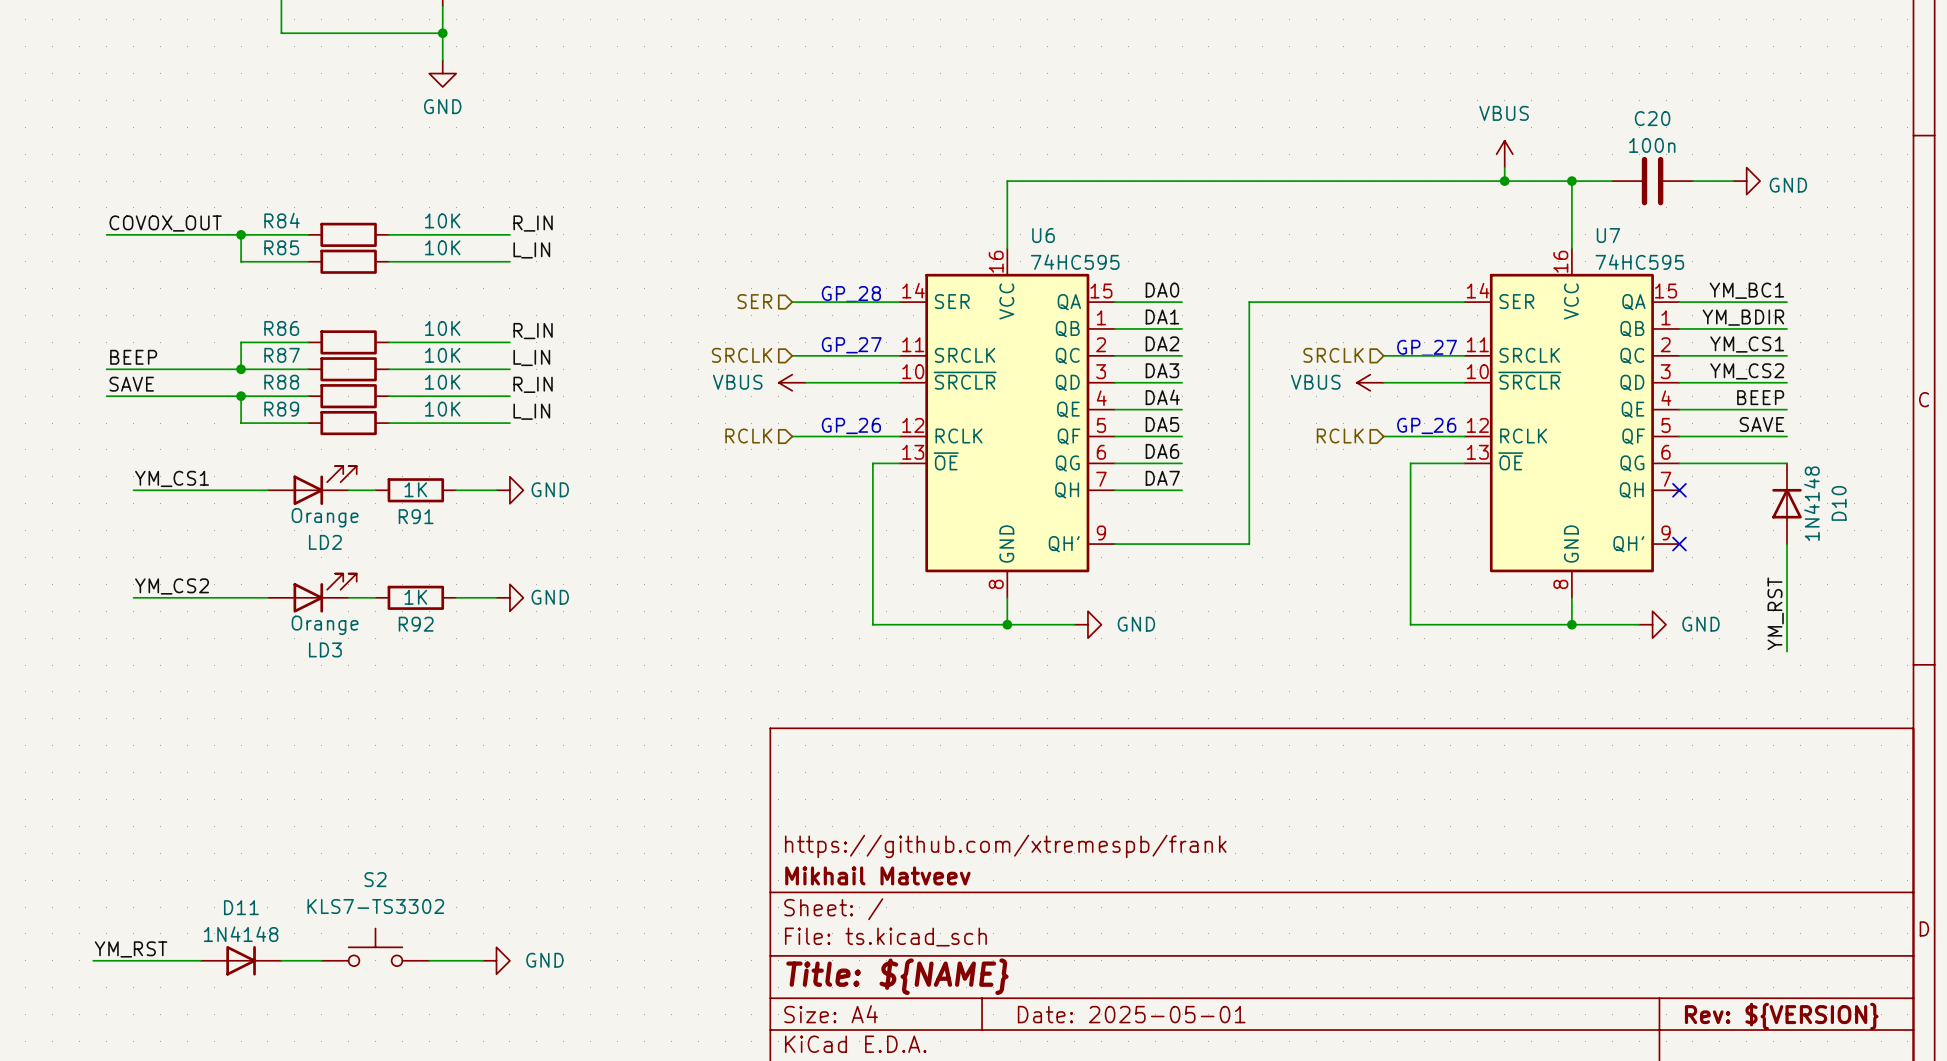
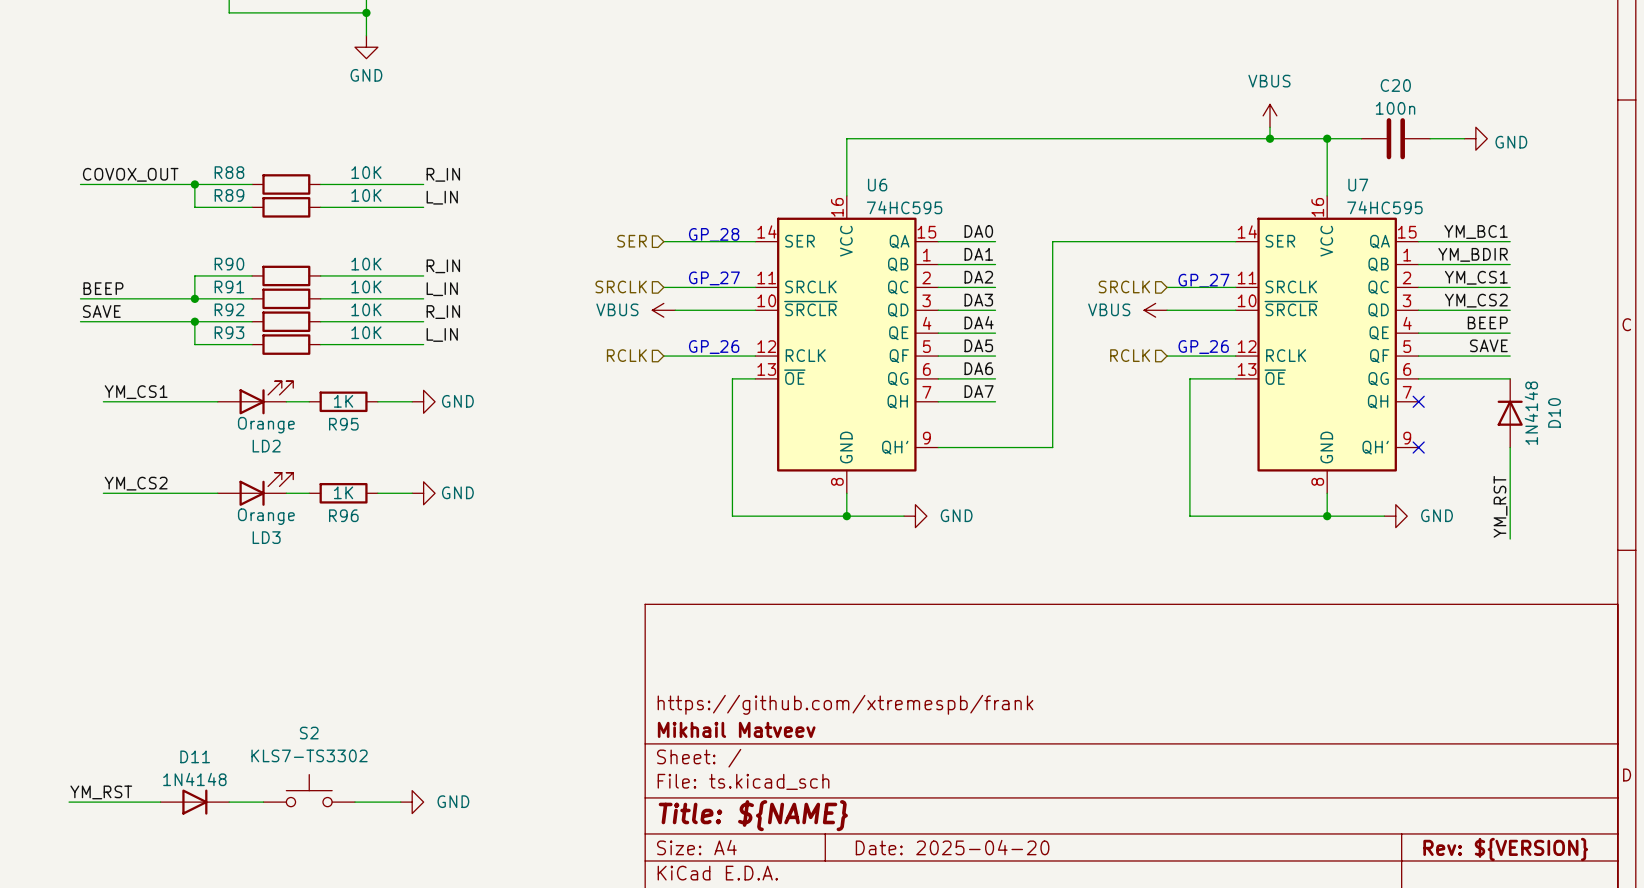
R84 name: R84 (282, 220) -> R88 (229, 172)
R85 name: R85 (281, 247) -> R89 (229, 195)
R86 name: R86 (281, 328) -> R90 (229, 264)
R87 name: R87 (282, 355) -> R91 (229, 286)
R88 name: R88 (281, 382) -> R92 (229, 309)
R89 name: R89 (281, 409) -> R93 (229, 332)
R91 name: R91 (416, 516) -> R95 (343, 424)
R92 name: R92 (416, 624) -> R96 (343, 515)
title block: Date: 2025-05-01 (1131, 1014) -> Date: 2025-04-20 (952, 847)

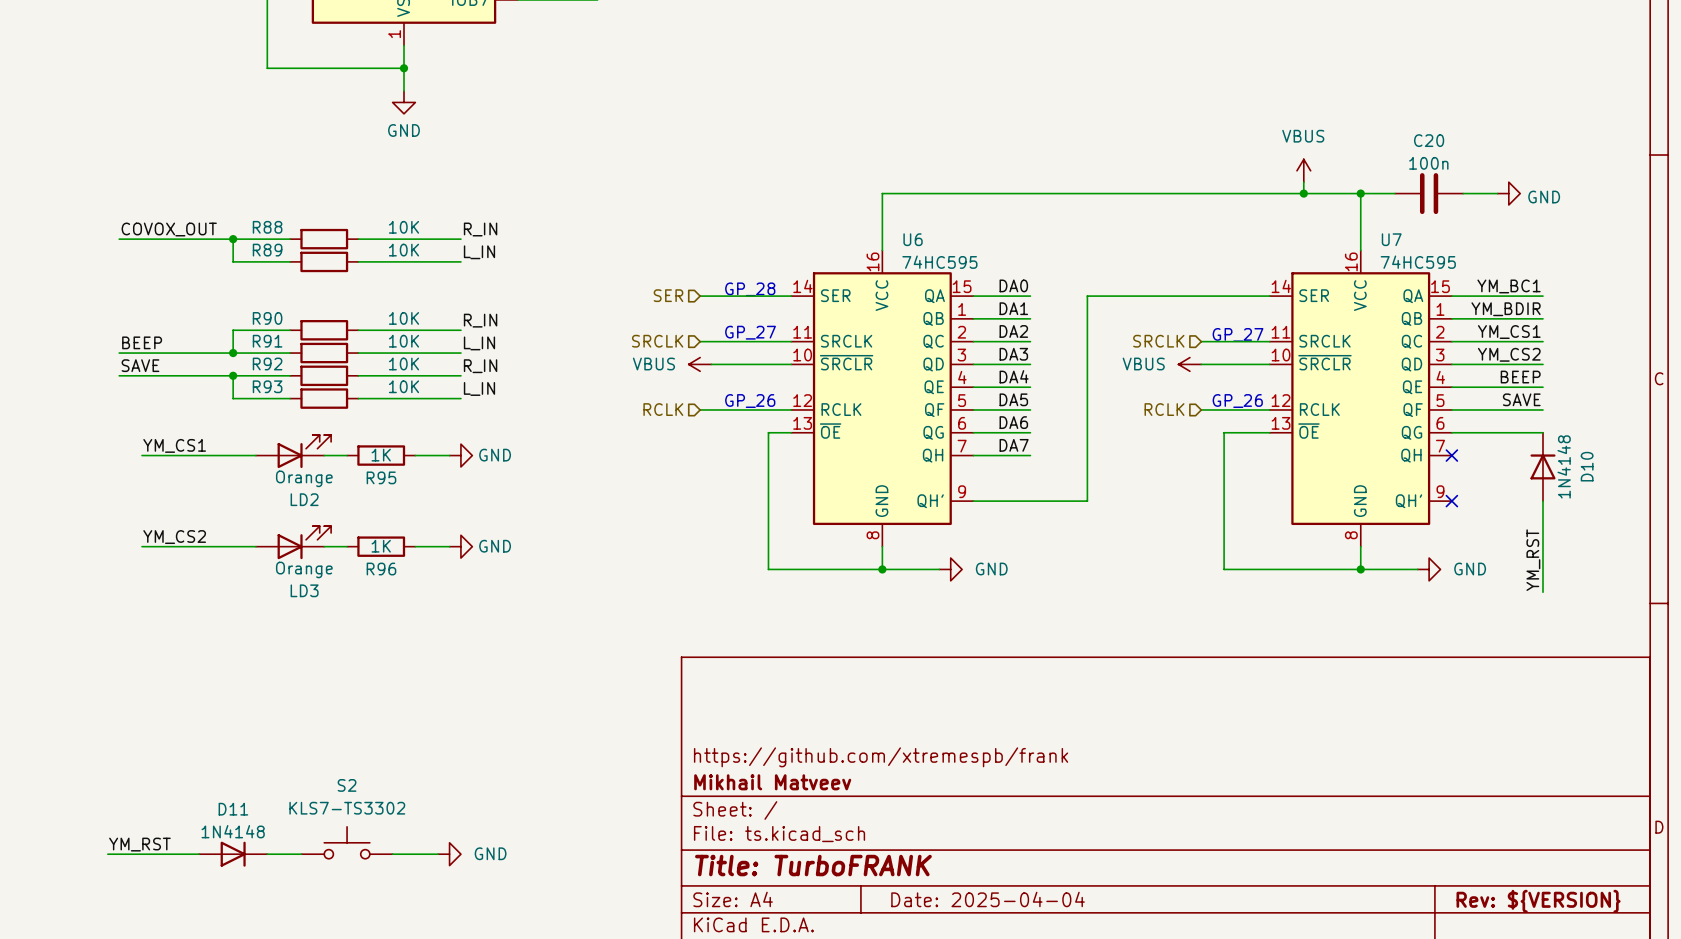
title block: Title: ${NAME} (753, 815) -> Title: TurboFRANK (813, 865)
title block: Date: 2025-04-20 (952, 847) -> Date: 2025-04-04 (988, 899)

